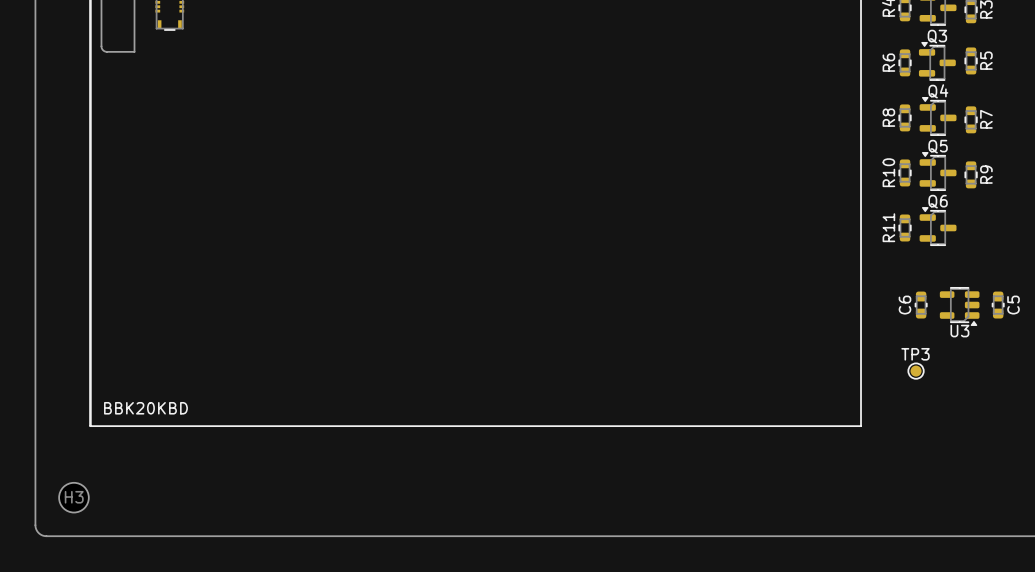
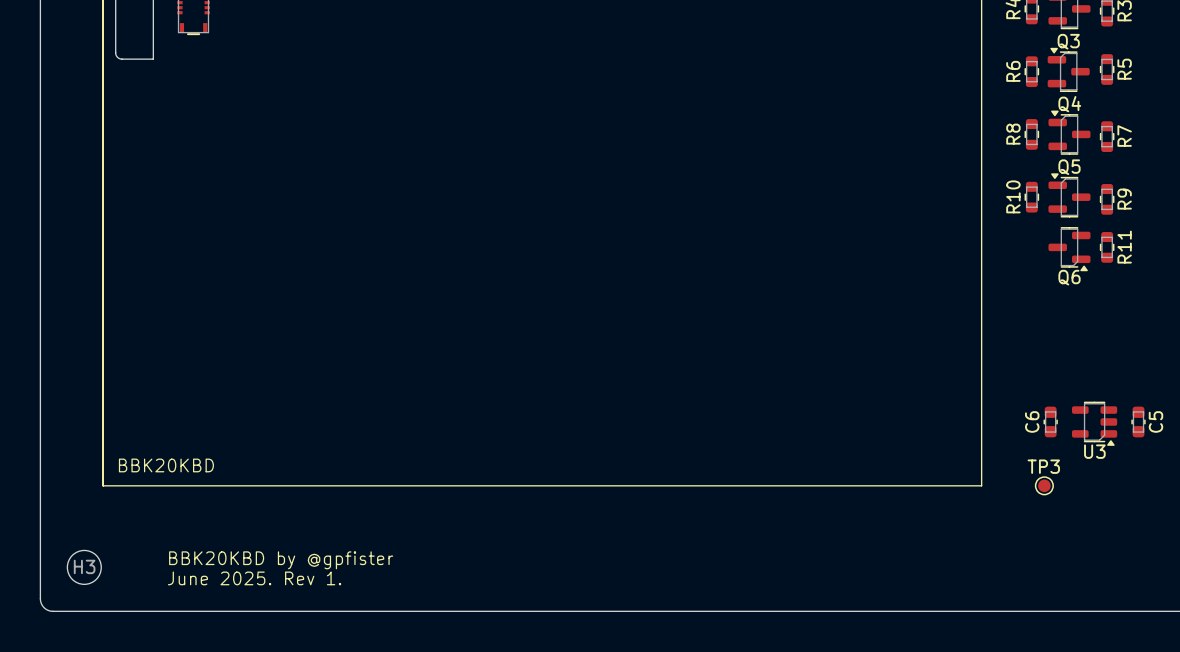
Q6 rotation: 0° (938, 226) -> 180° (1069, 249)
R11 name position: R11 (888, 227) -> R11 (1124, 247)
R11 position: (905, 227) -> (1107, 247)
C6 position: (921, 305) -> (1050, 421)
C5 position: (998, 305) -> (1138, 421)
U3 position: (959, 306) -> (1094, 423)
TP3 position: (916, 371) -> (1044, 485)
text: none -> BBK20KBD by @gpfister (281, 560)
text: none -> June 2025. Rev 1. (254, 578)

